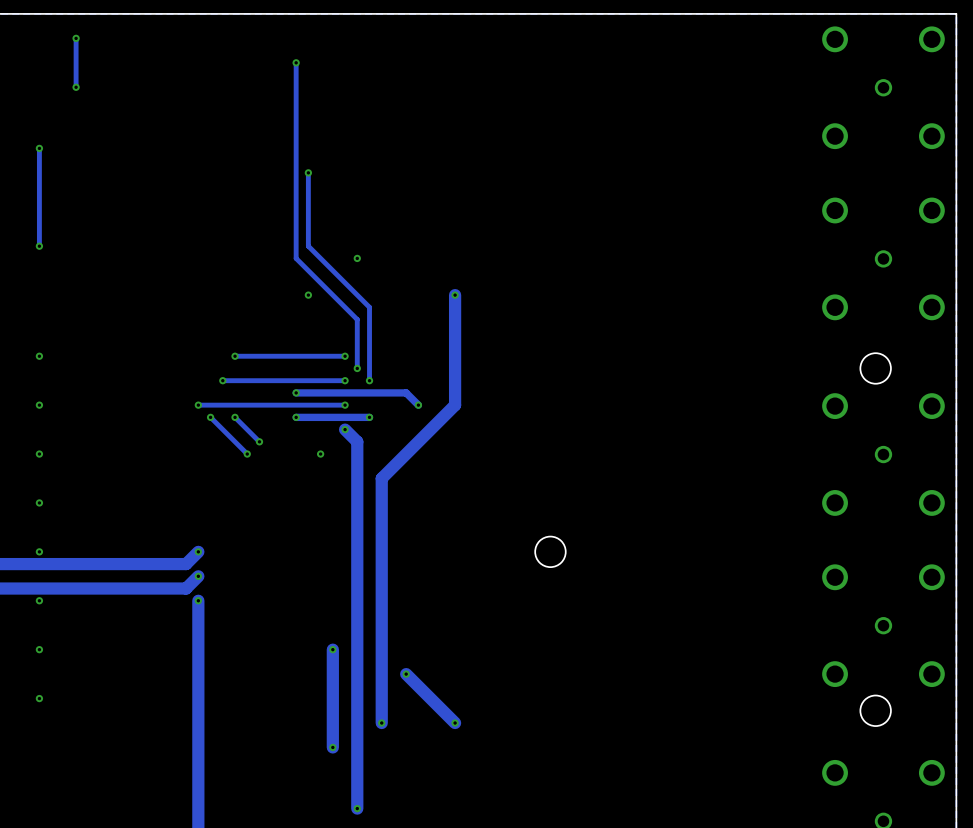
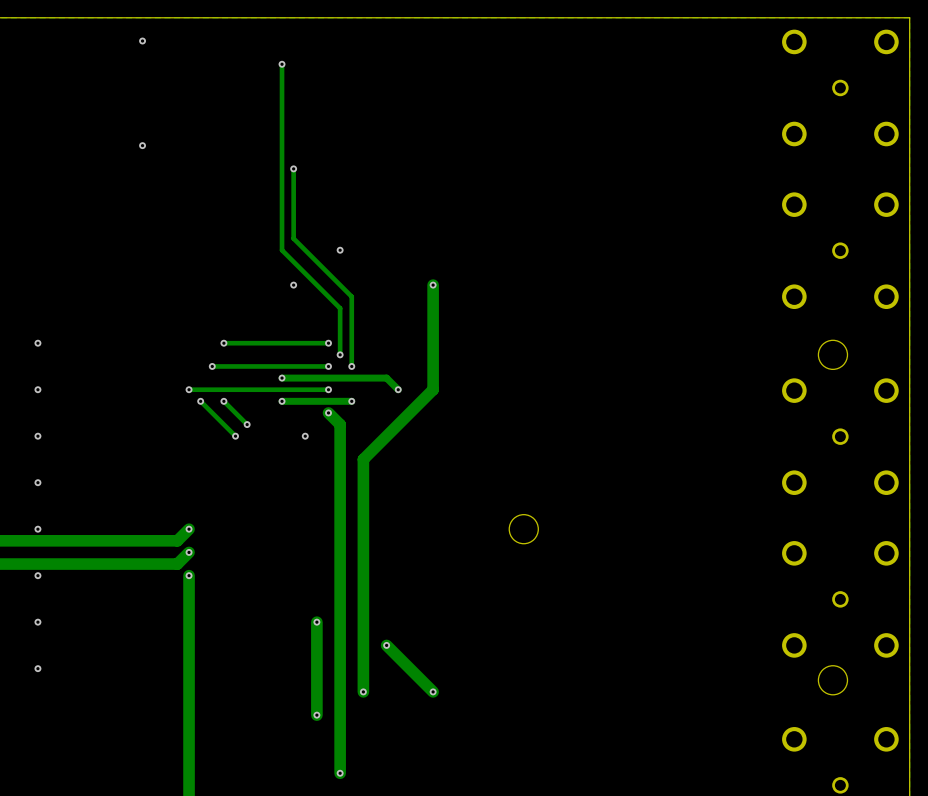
track: (76, 38) (76, 87) -> none
via: (76, 38) -> none
via: none -> (142, 41)
via: (76, 87) -> none
track: (39, 148) (39, 246) -> none
via: (39, 148) -> none
via: none -> (142, 145)
via: (39, 246) -> none

